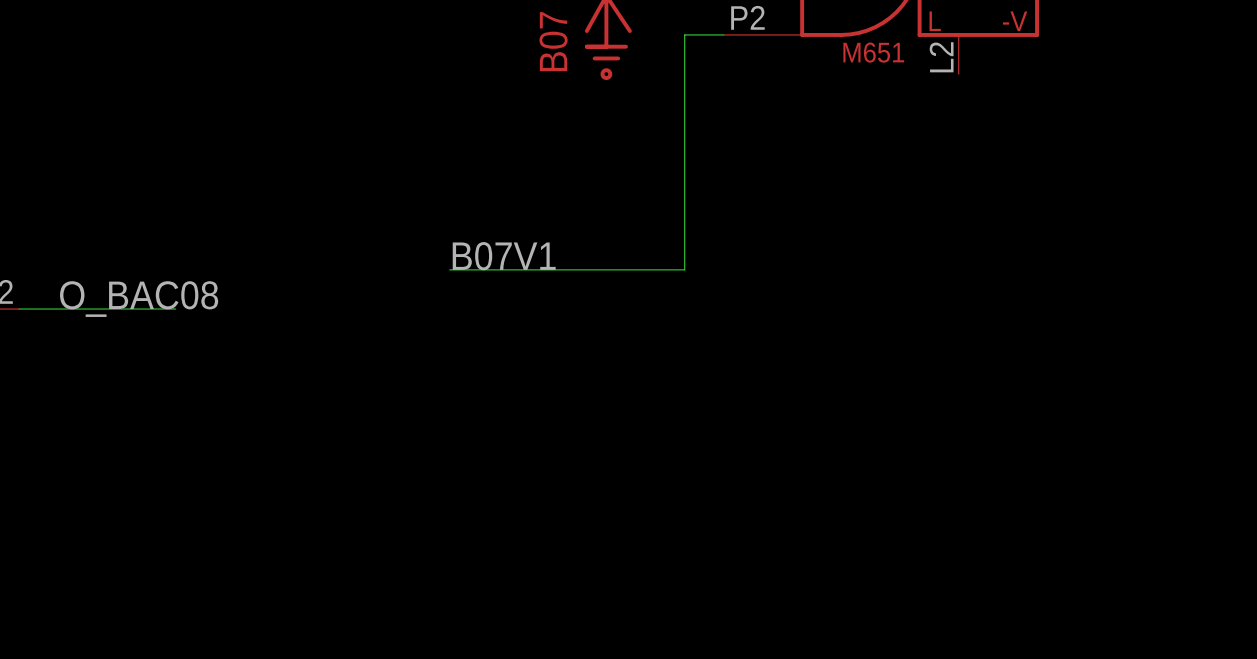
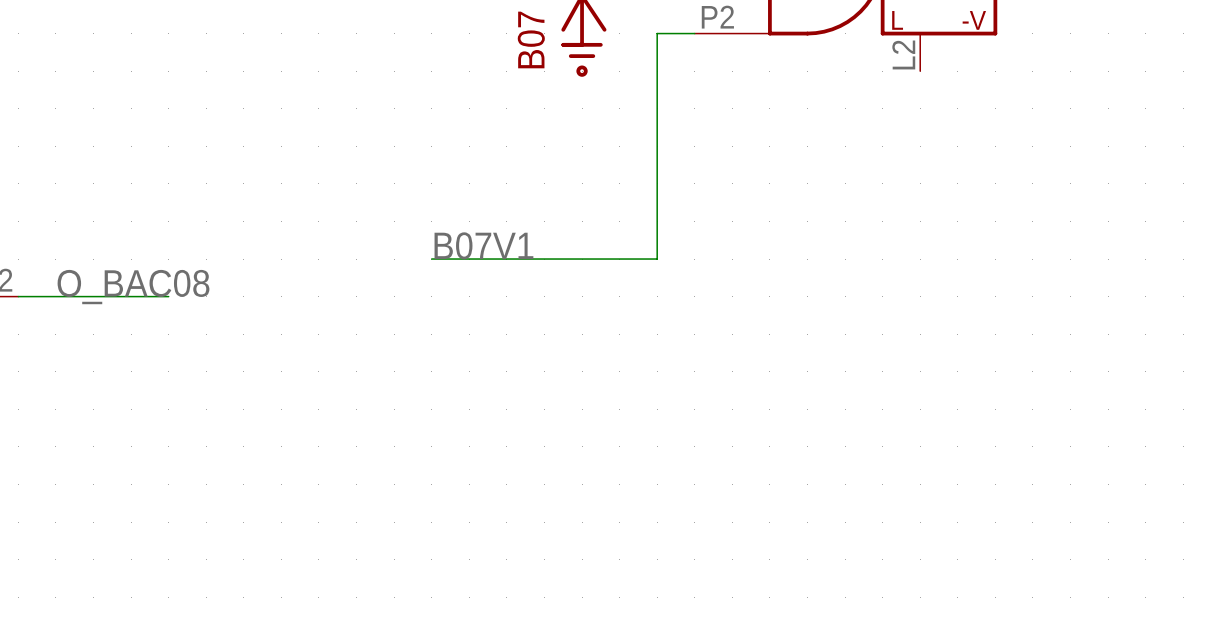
part value: M651 (873, 52) -> none

